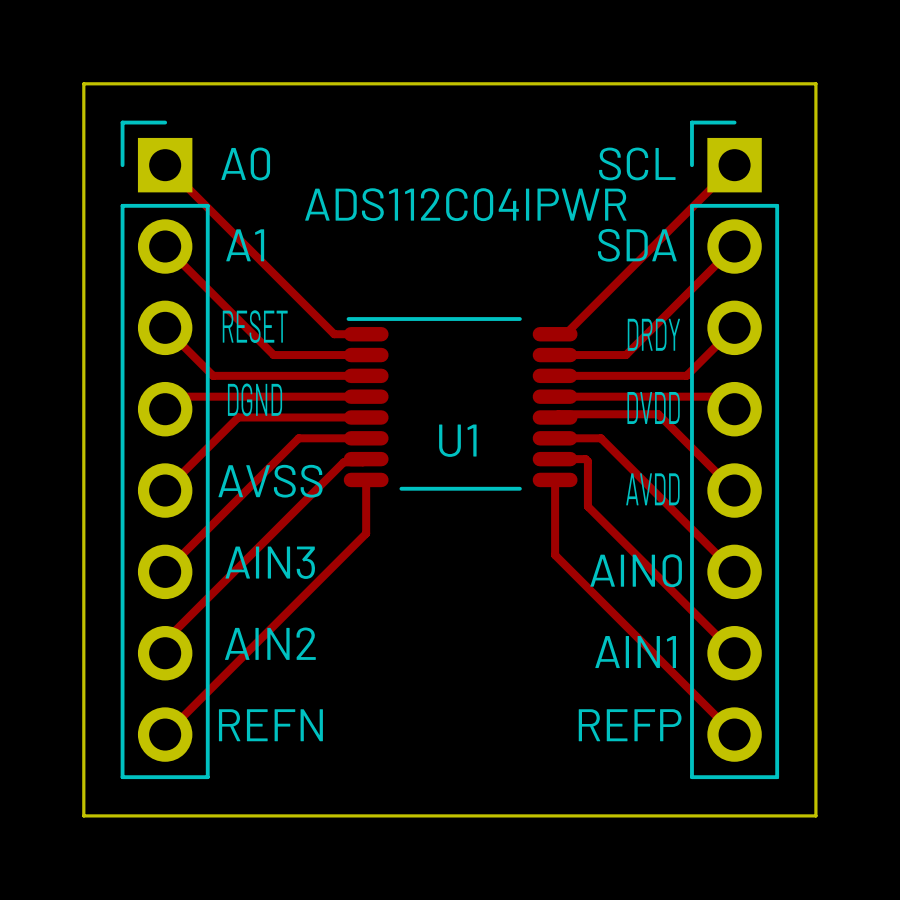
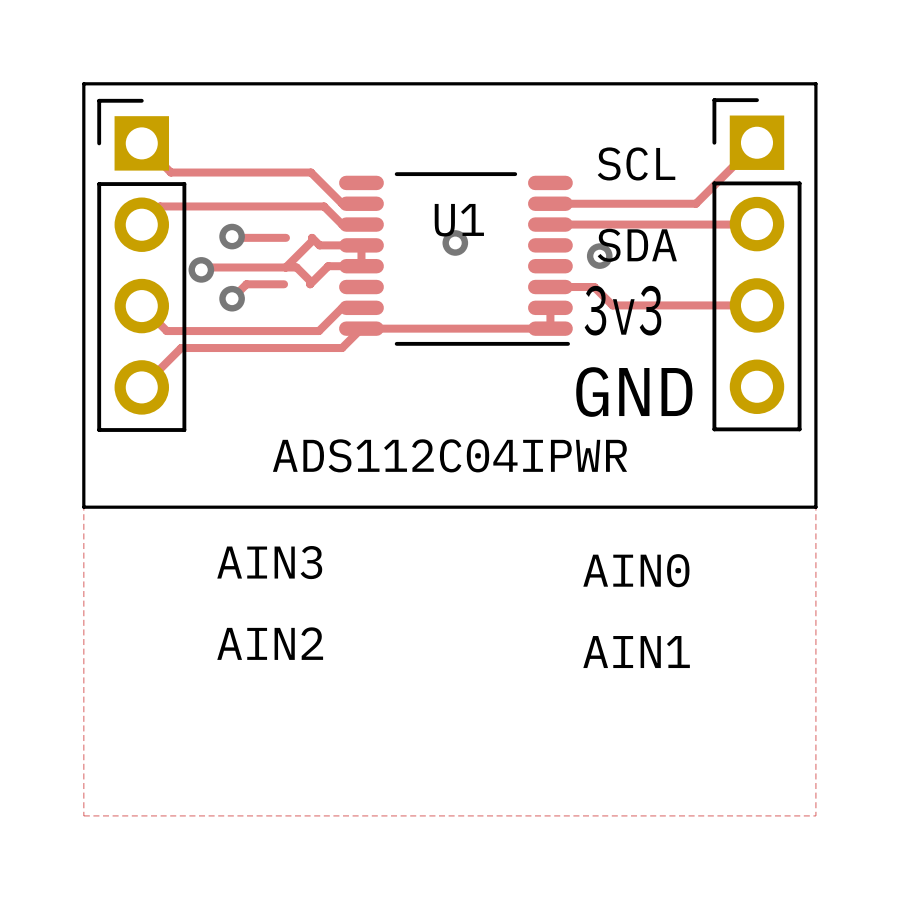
track: none -> (141, 143) (170, 172) (310, 172) (342, 203) (361, 203)
text: A0 (245, 163) -> none
track: (165, 165) (334, 334) (366, 334) -> none
track: (695, 203) (565, 334) (555, 334) -> (695, 203) (550, 203)
track: none -> (361, 224) (342, 224) (324, 206) (160, 206) (141, 224)
track: none -> (756, 224) (550, 224)
track: none -> (232, 236) (285, 237)
via: none -> (232, 236)
via: none -> (455, 242)
text: A1 (245, 245) -> none
track: (165, 246) (273, 355) (366, 355) -> none
track: (734, 246) (626, 355) (555, 355) -> none
via: none -> (599, 256)
part: none -> (756, 264)
part: none -> (141, 265)
track: none -> (285, 267) (312, 241) (312, 237) (319, 245) (361, 245) (361, 266) (328, 266) (310, 284) (310, 281) (296, 267) (203, 267) (201, 269)
via: none -> (201, 269)
track: none -> (284, 284) (246, 284) (232, 298)
track: none -> (550, 287) (594, 287) (612, 305) (756, 305)
via: none -> (232, 298)
track: none -> (141, 306) (166, 331) (318, 331) (342, 307) (361, 307)
track: none -> (550, 307) (550, 328) (361, 328) (342, 348) (181, 348) (141, 387)
text: none -> 3v3 (622, 310)
text: RESET (255, 326) -> none
track: (165, 327) (213, 375) (366, 375) -> none
track: (734, 327) (686, 375) (555, 375) -> none
text: DRDY (653, 334) -> none
track: (366, 396) (177, 396) (165, 409) -> none
track: (555, 396) (722, 396) (734, 409) -> none
text: DGND (255, 399) -> none
U1 rotation: 0° (460, 403) -> 180° (455, 258)
U1 position: (460, 403) -> (455, 258)
text: DVDD (653, 407) -> GND (634, 392)
track: (366, 417) (238, 417) (165, 490) -> none
track: (555, 417) (558, 414) (658, 414) (734, 490) -> none
track: (366, 438) (298, 438) (165, 571) -> none
track: (555, 438) (601, 438) (734, 571) -> none
part: (165, 449) -> none
part: (734, 449) -> none
track: (366, 459) (362, 462) (343, 462) (165, 640) (165, 653) -> none
track: (555, 459) (585, 459) (587, 461) (587, 506) (734, 653) -> none
track: (366, 479) (366, 533) (165, 734) -> none
track: (555, 479) (555, 555) (734, 734) -> none
text: AVSS (270, 481) -> none
text: AVDD (652, 489) -> none
board edge: (83, 507) (83, 815) (815, 815) (815, 507) -> (83, 507) (815, 507)
text: REFN (270, 725) -> none
text: REFP (630, 725) -> none

